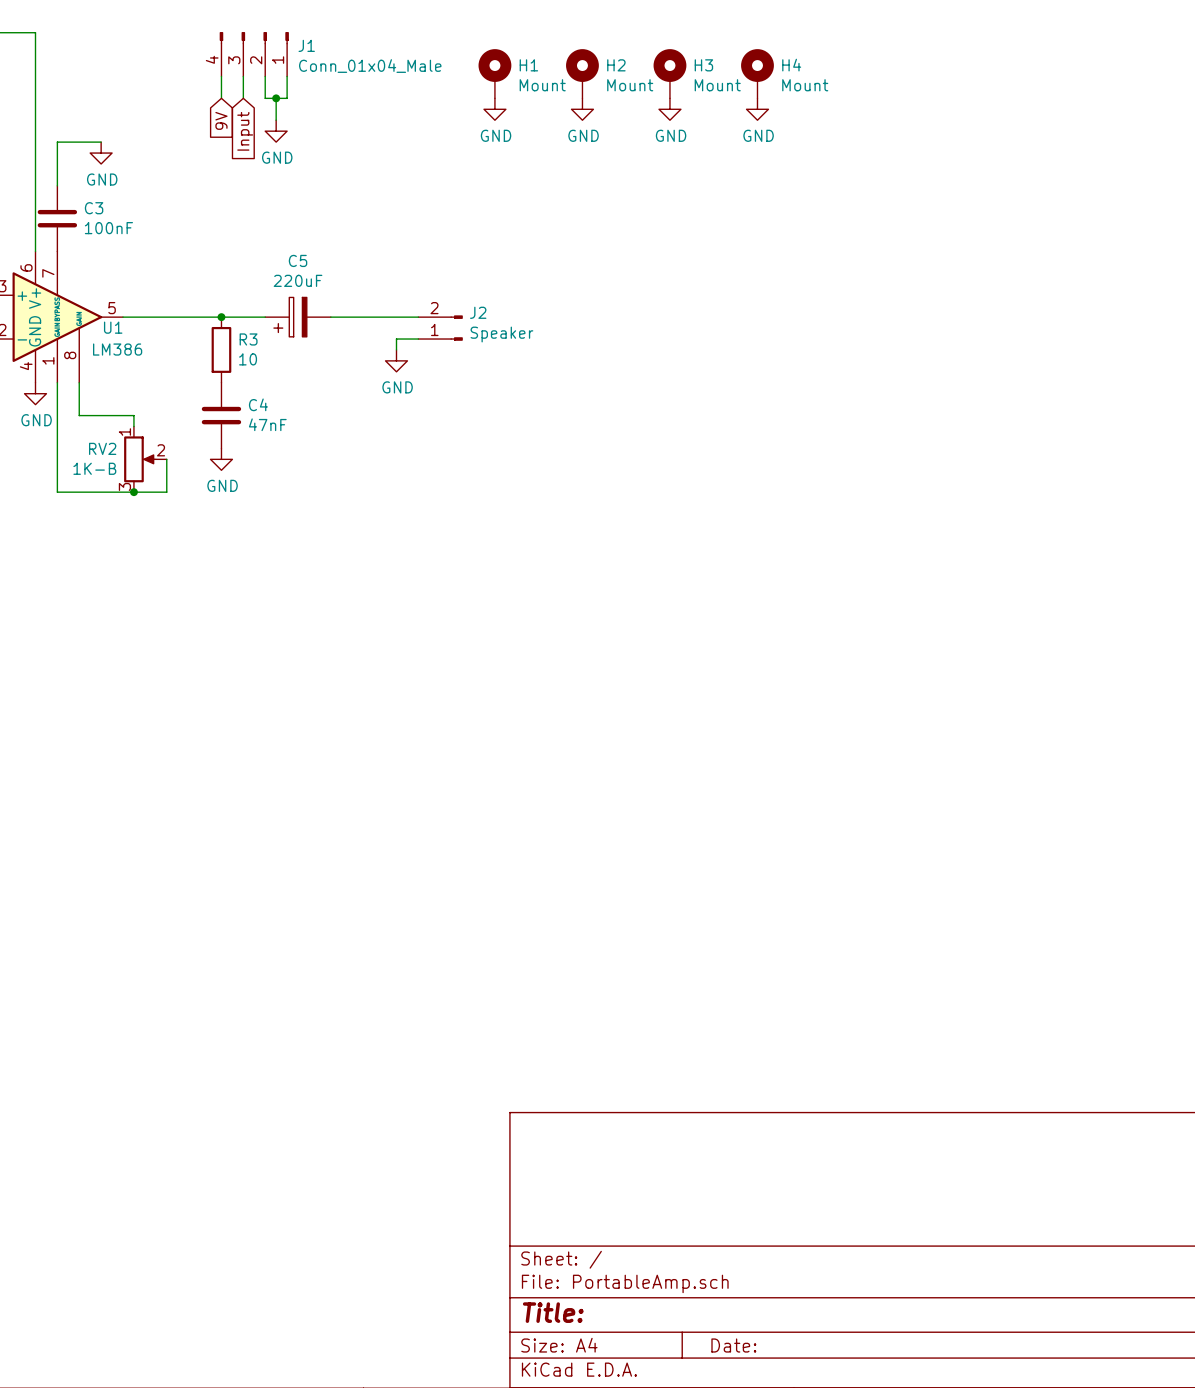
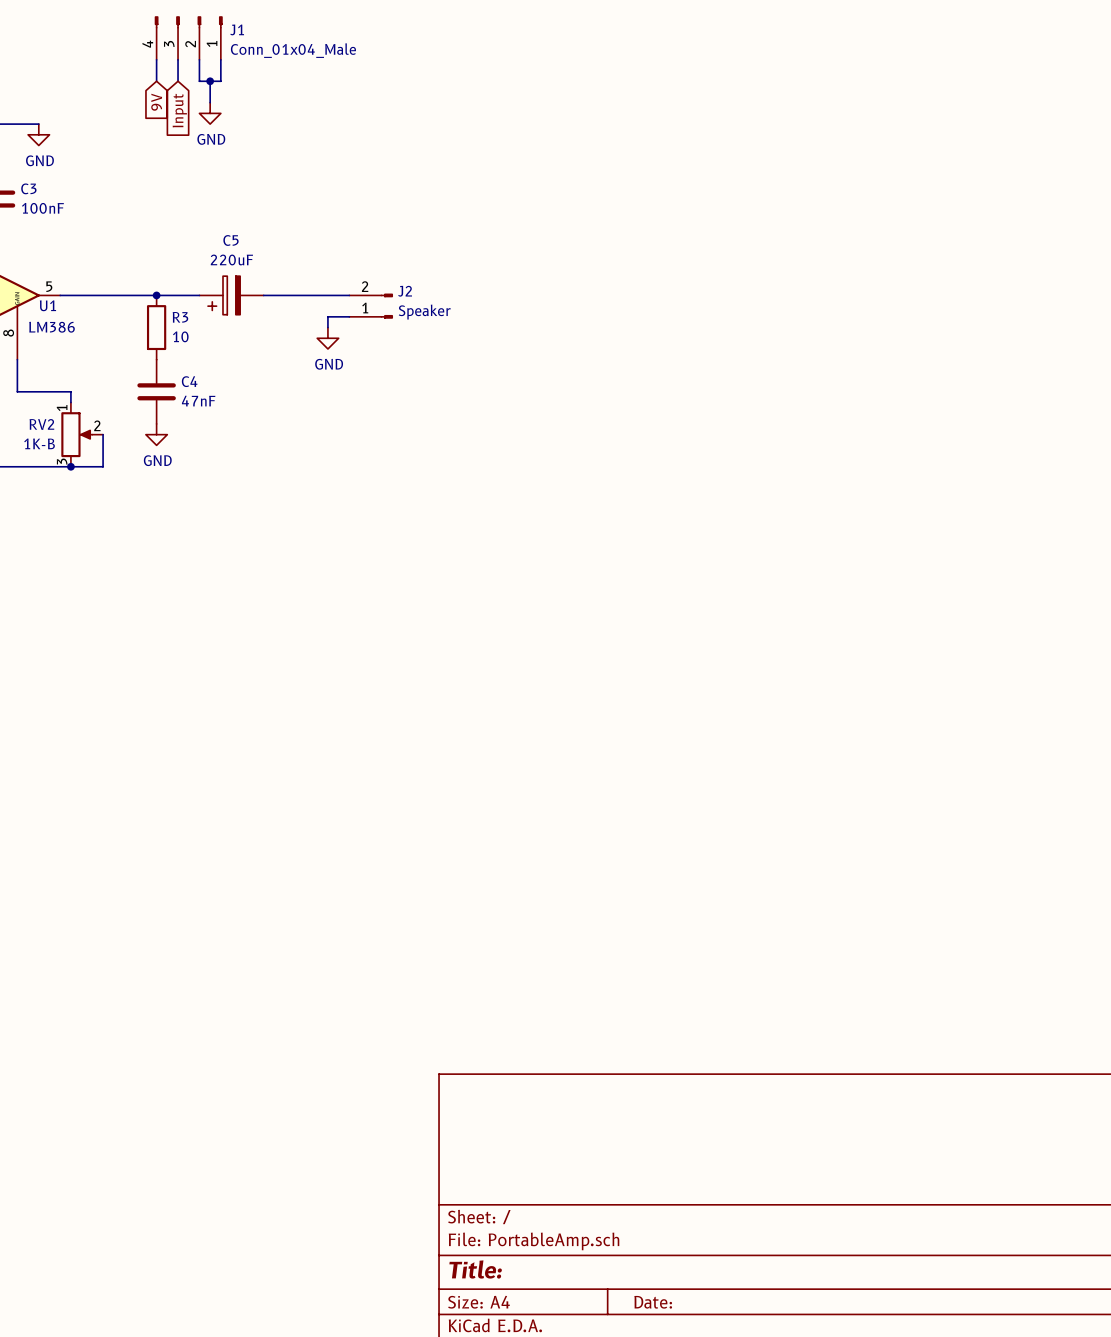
H1: Mount (494, 73) -> none
H2: Mount (582, 73) -> none
H3: Mount (669, 73) -> none
H4: Mount (757, 73) -> none
power symbol: GND (494, 109) -> none
power symbol: GND (582, 109) -> none
power symbol: GND (669, 109) -> none
power symbol: GND (757, 109) -> none

